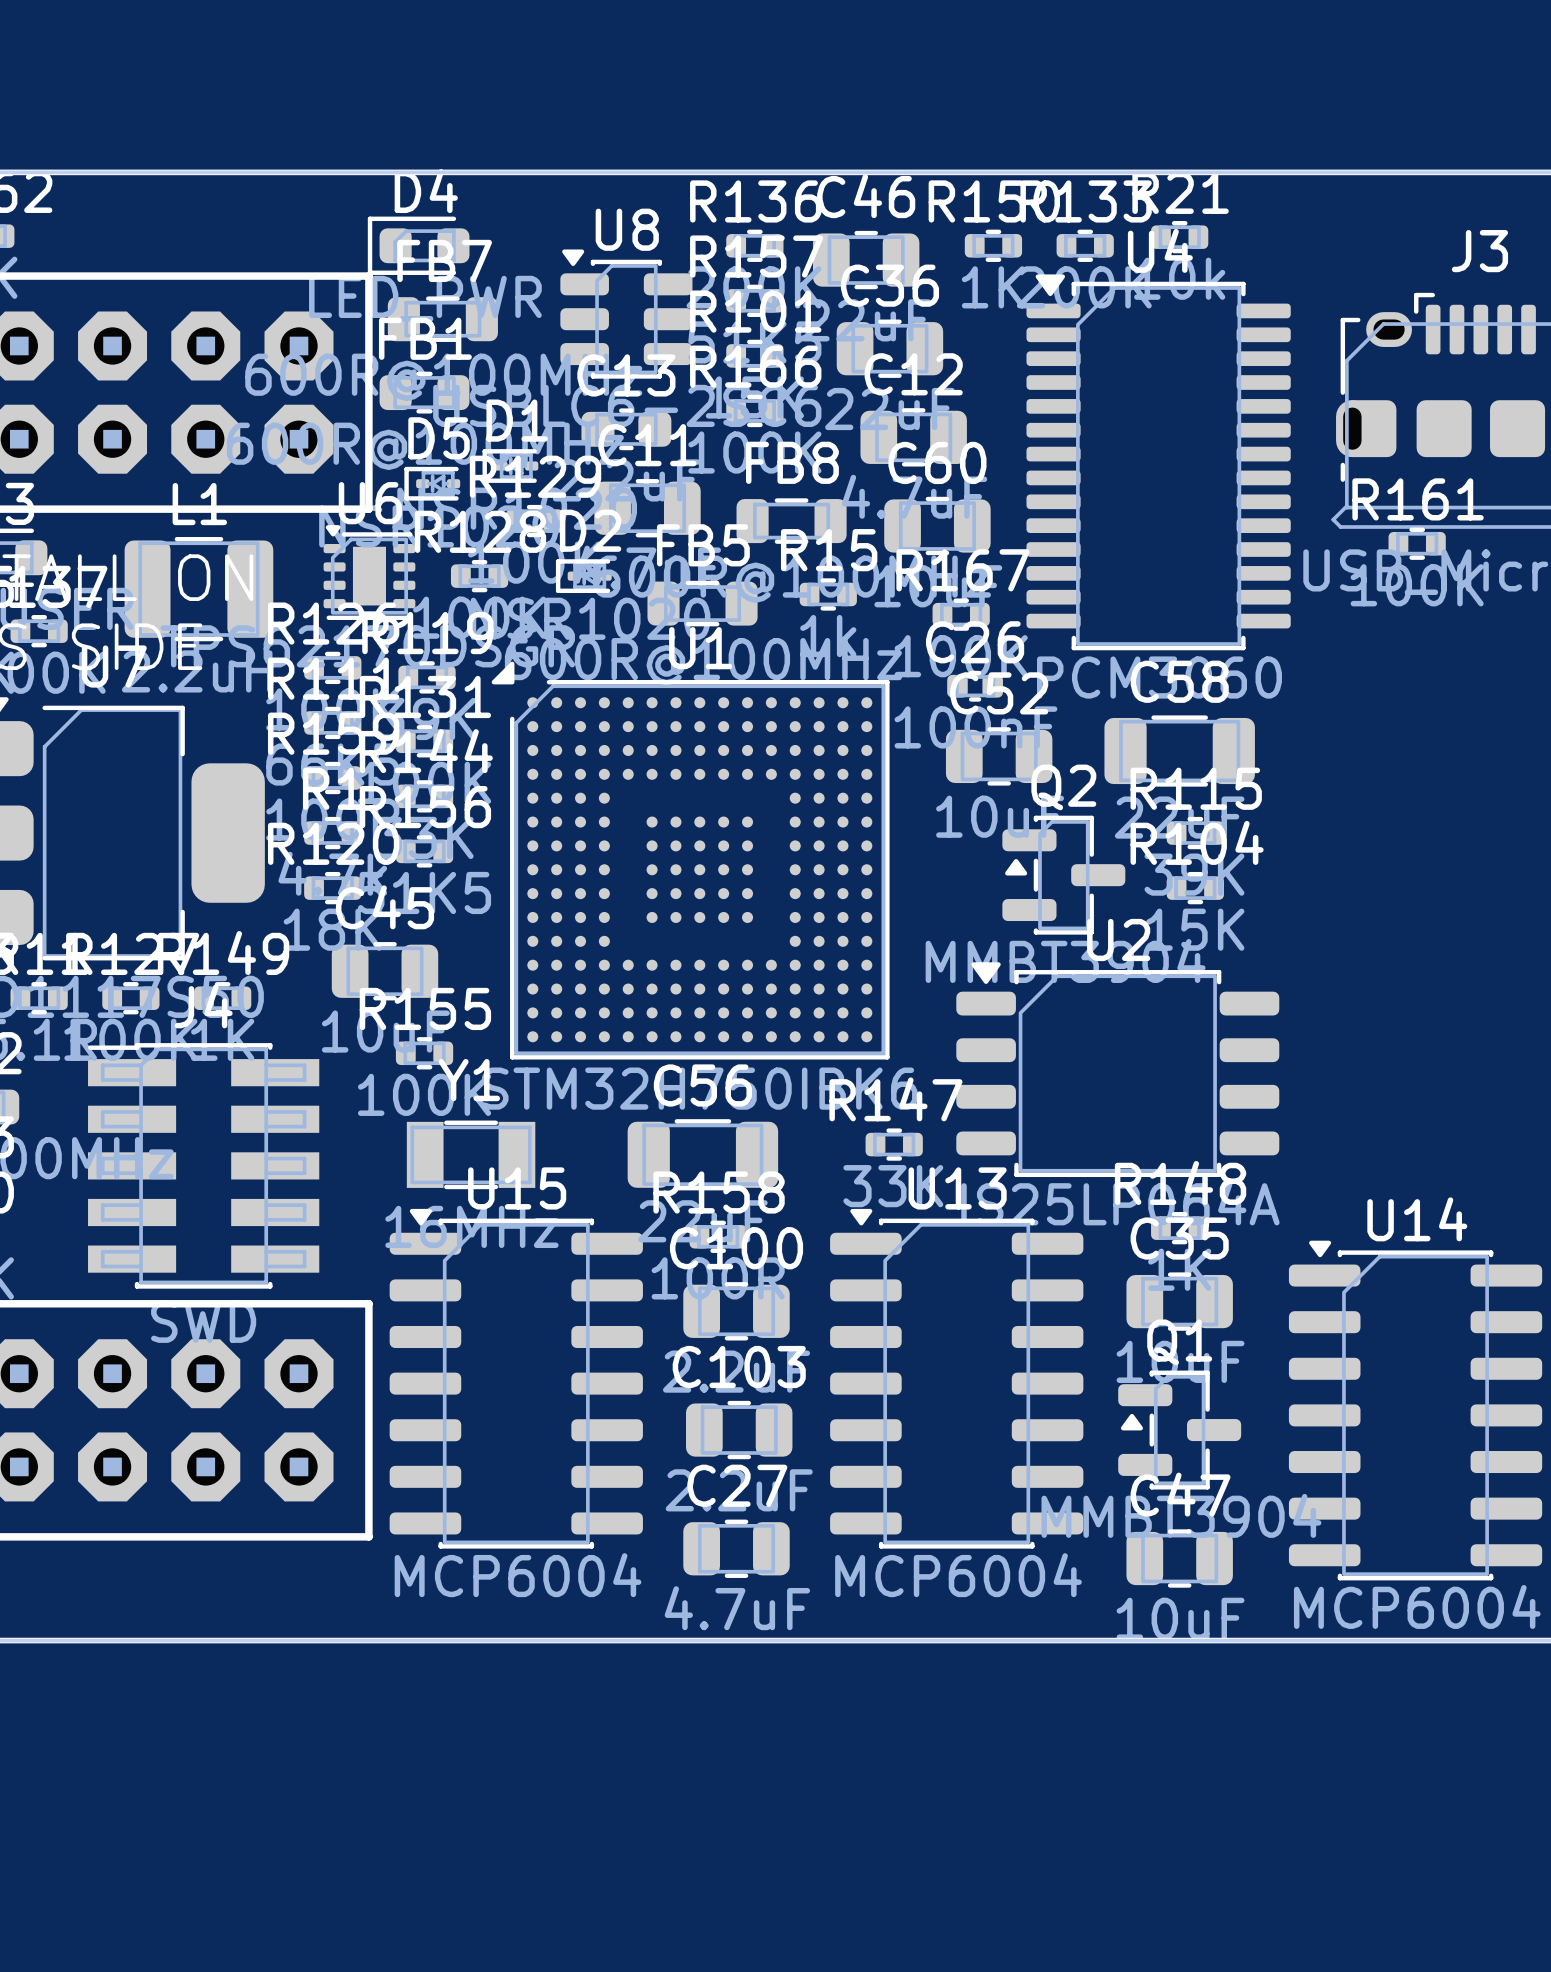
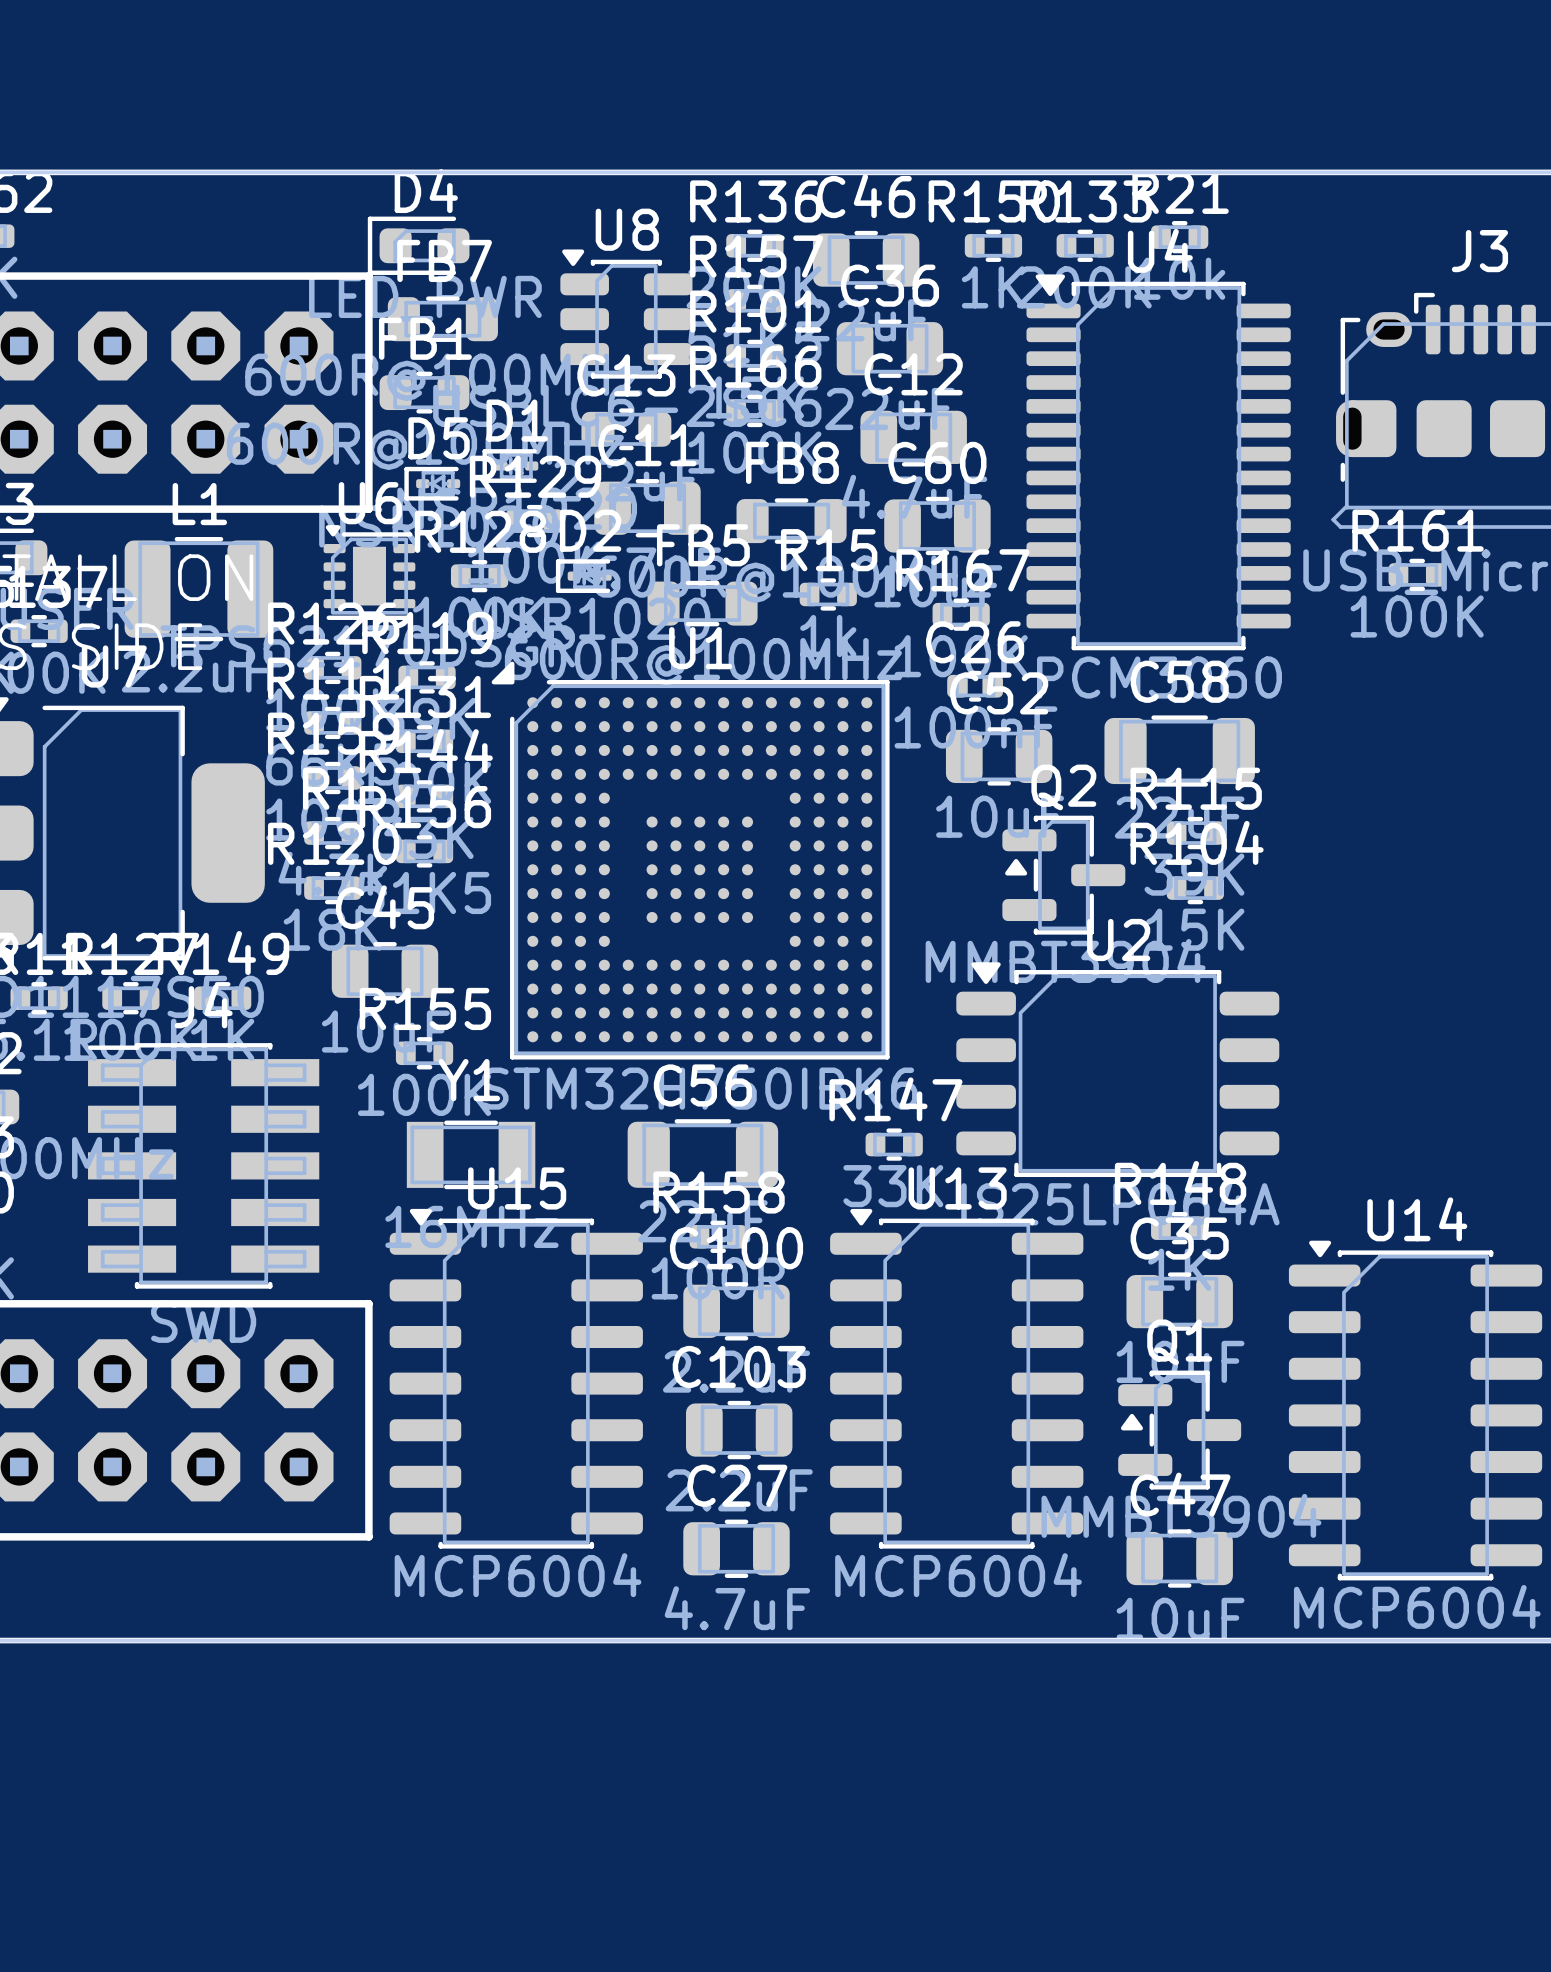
R161 position: (1417, 543) -> (1417, 574)

